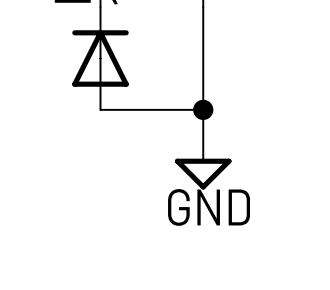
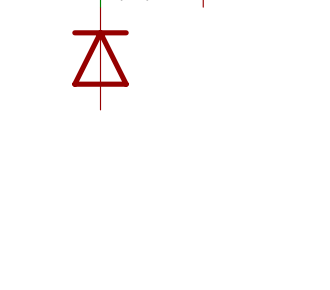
wire: (203, 7) (203, 109) (100, 109) -> none
junction: (203, 109) -> none
power symbol: GND (203, 149) -> none

